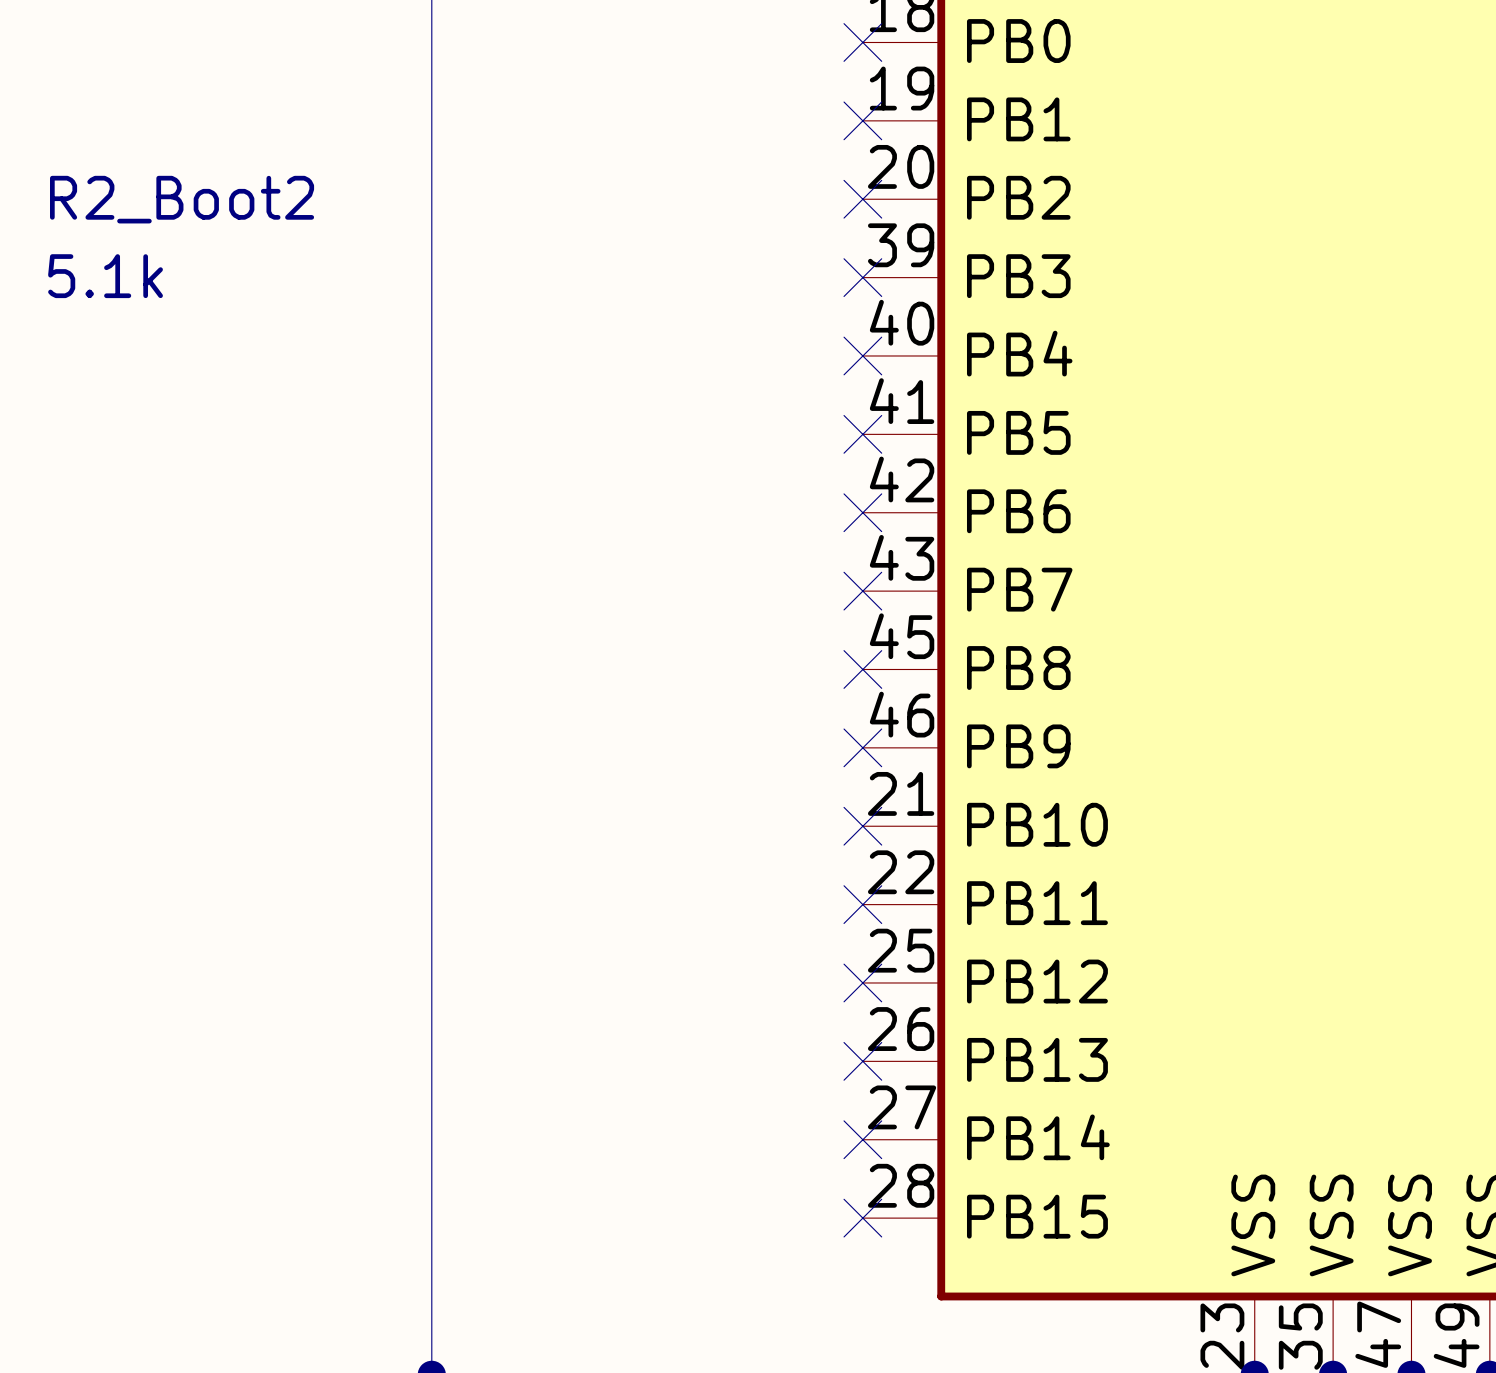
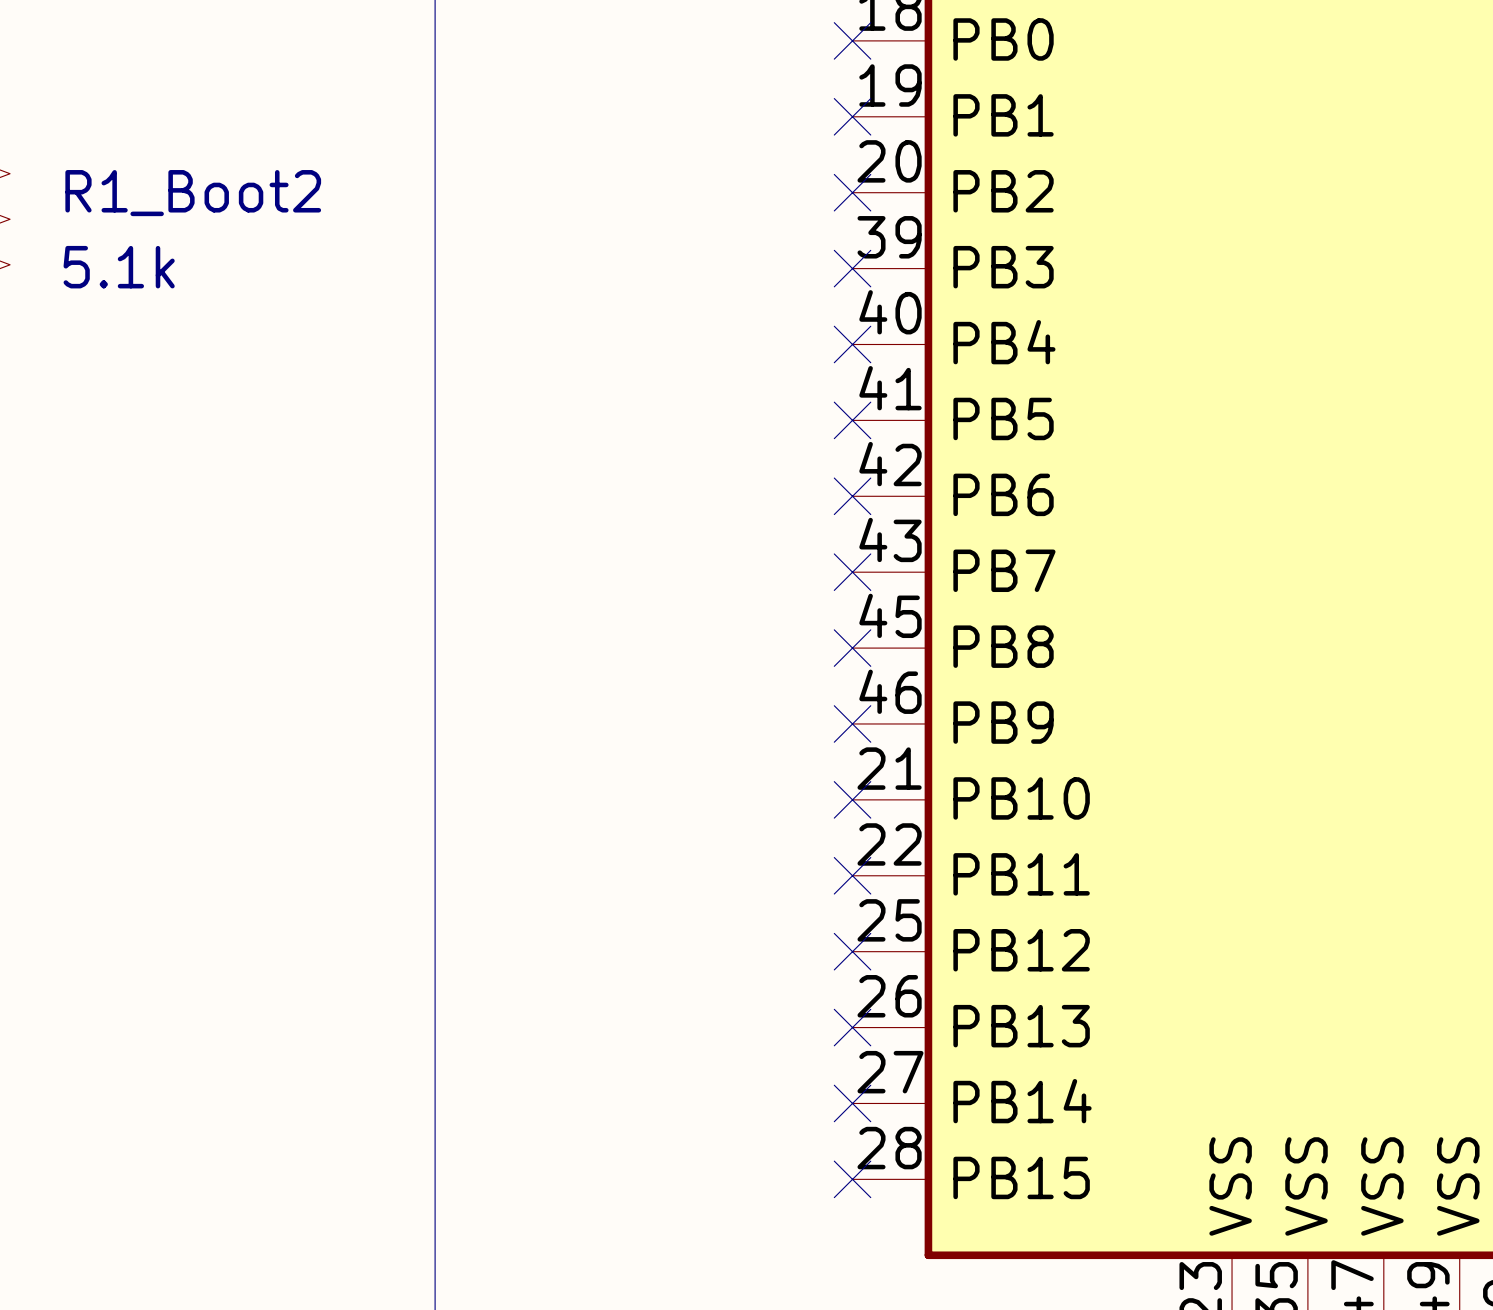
R2_Boot2 name: R2_Boot2 (182, 199) -> R1_Boot2 (193, 193)

